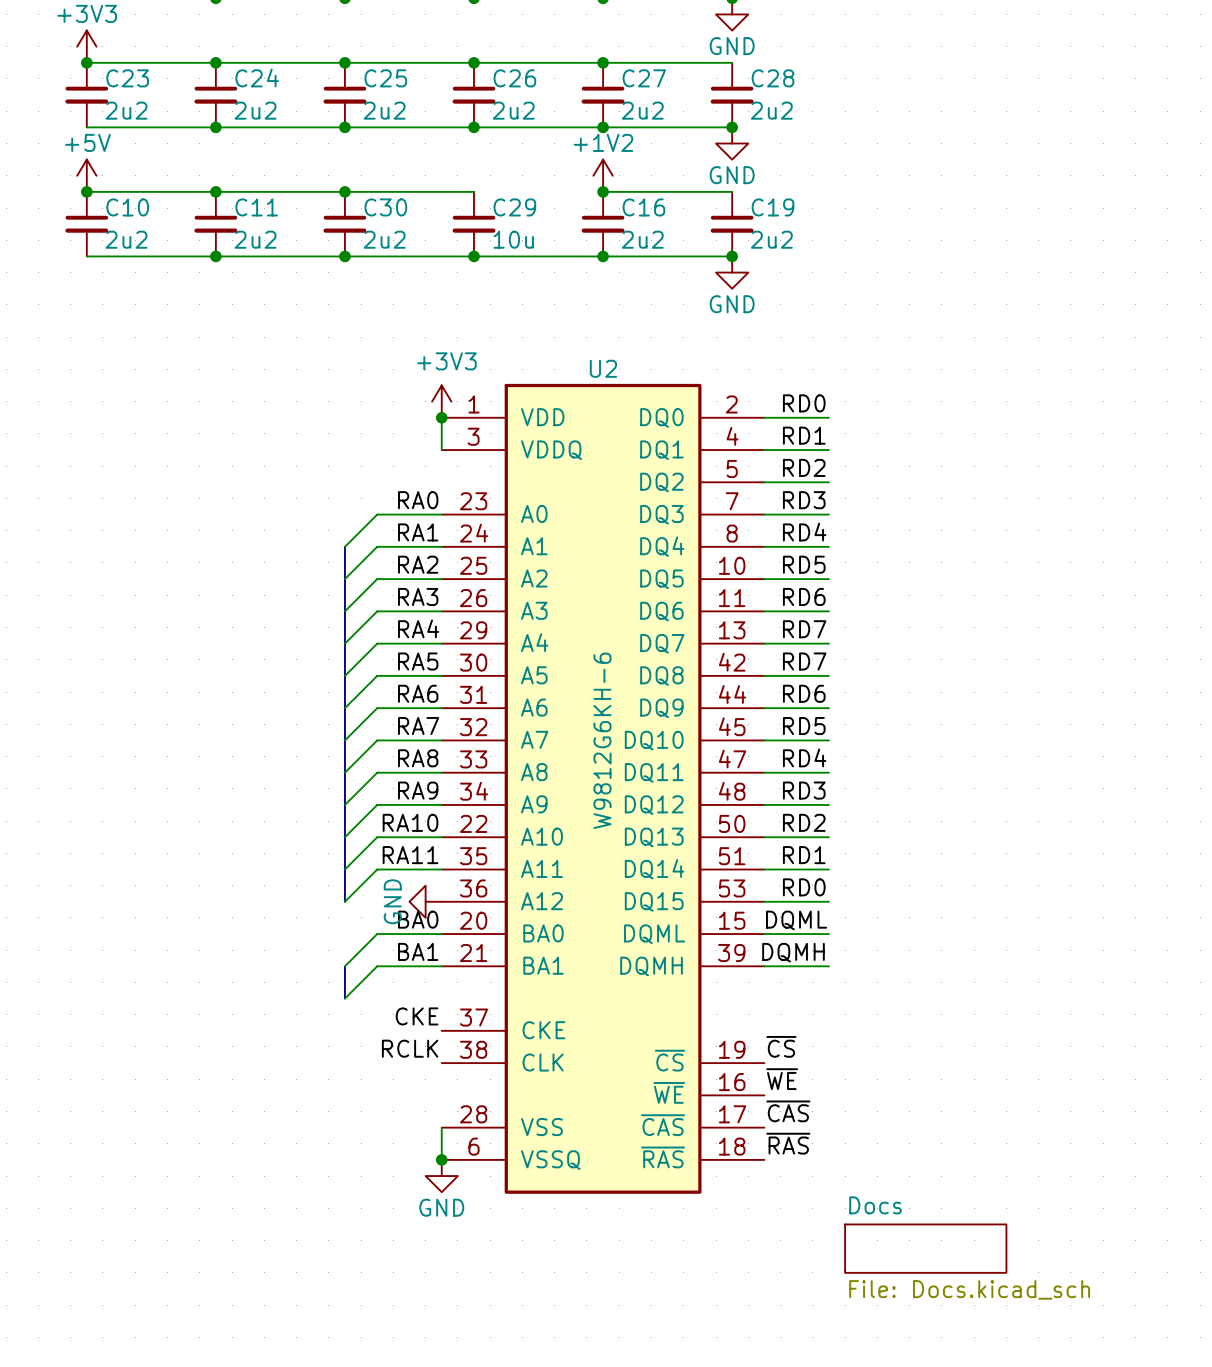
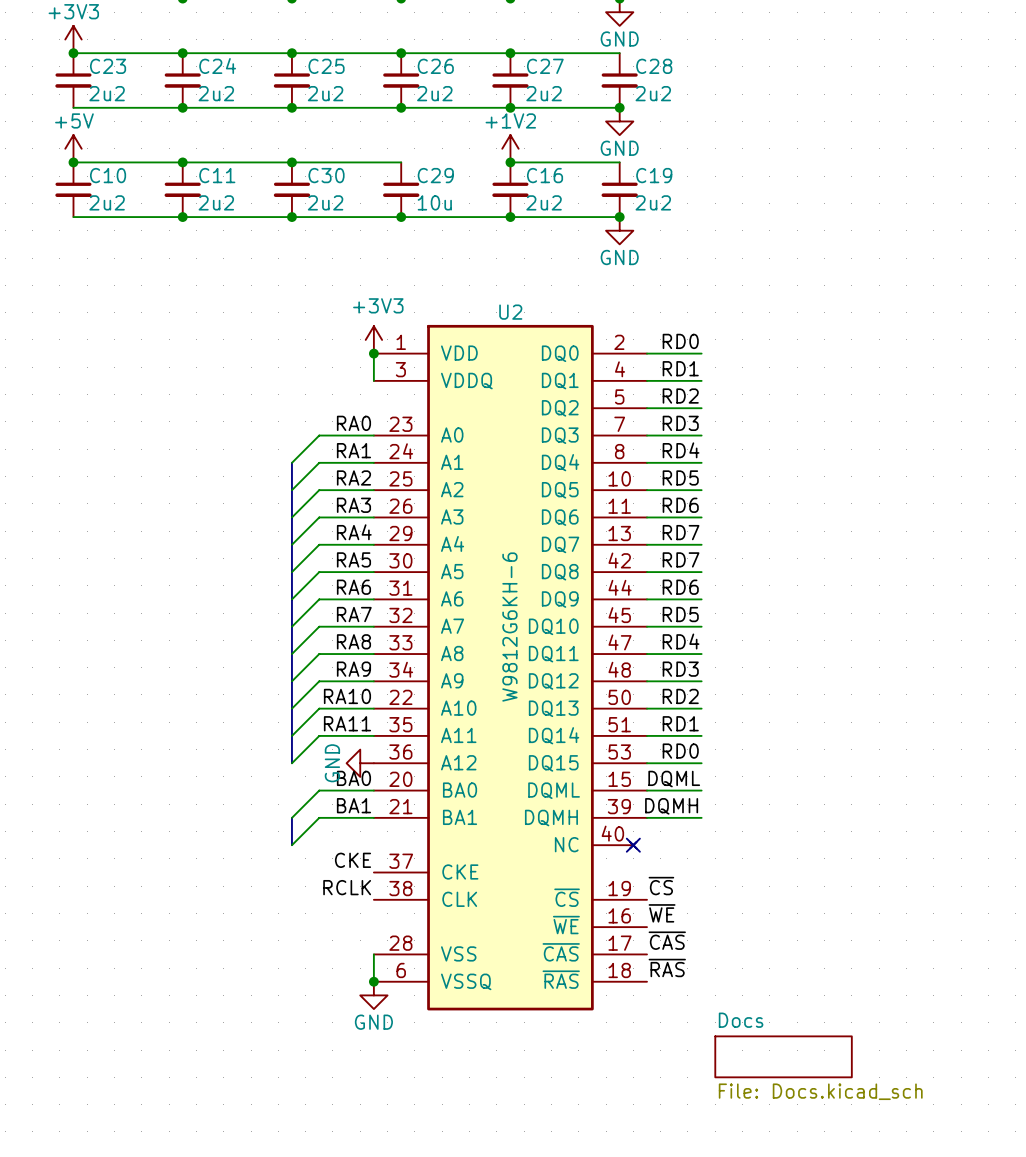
U2 symbol: [441, 383, 765, 1194] -> [373, 324, 648, 1011]
no-connect mark: none -> (633, 845)

